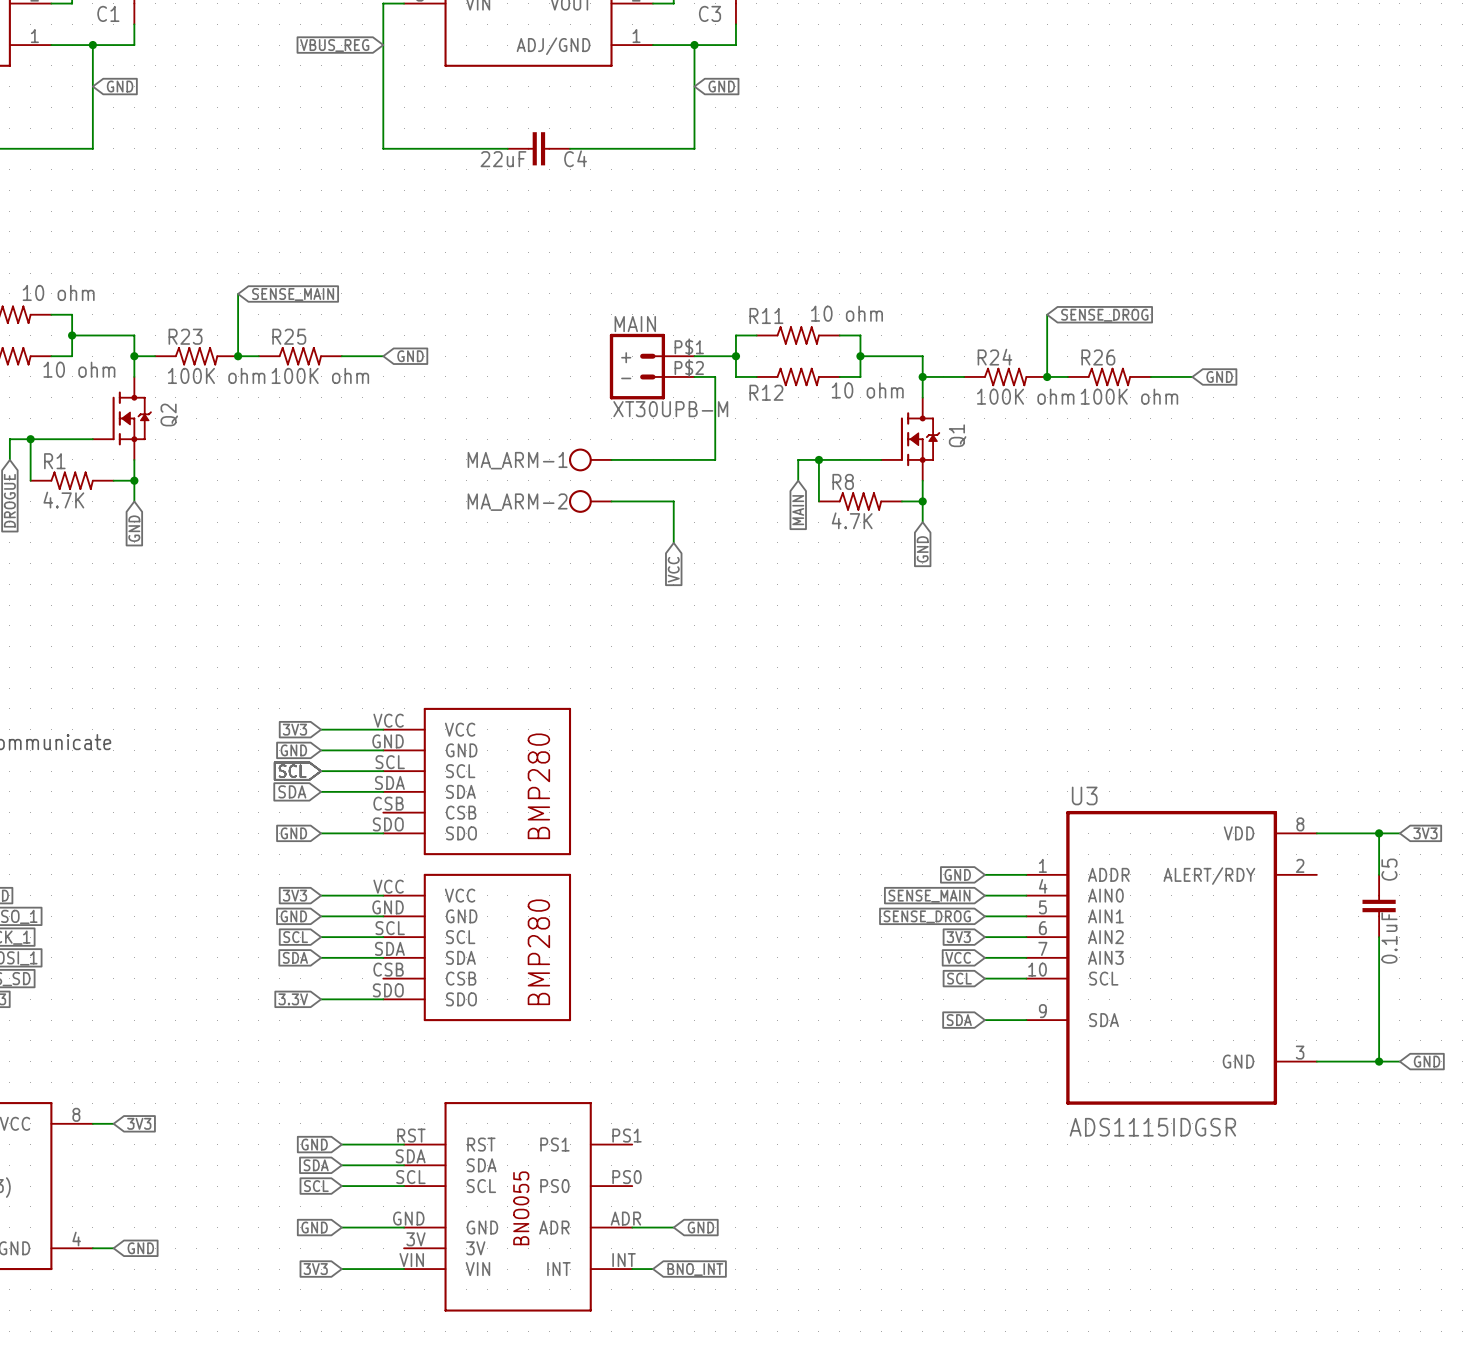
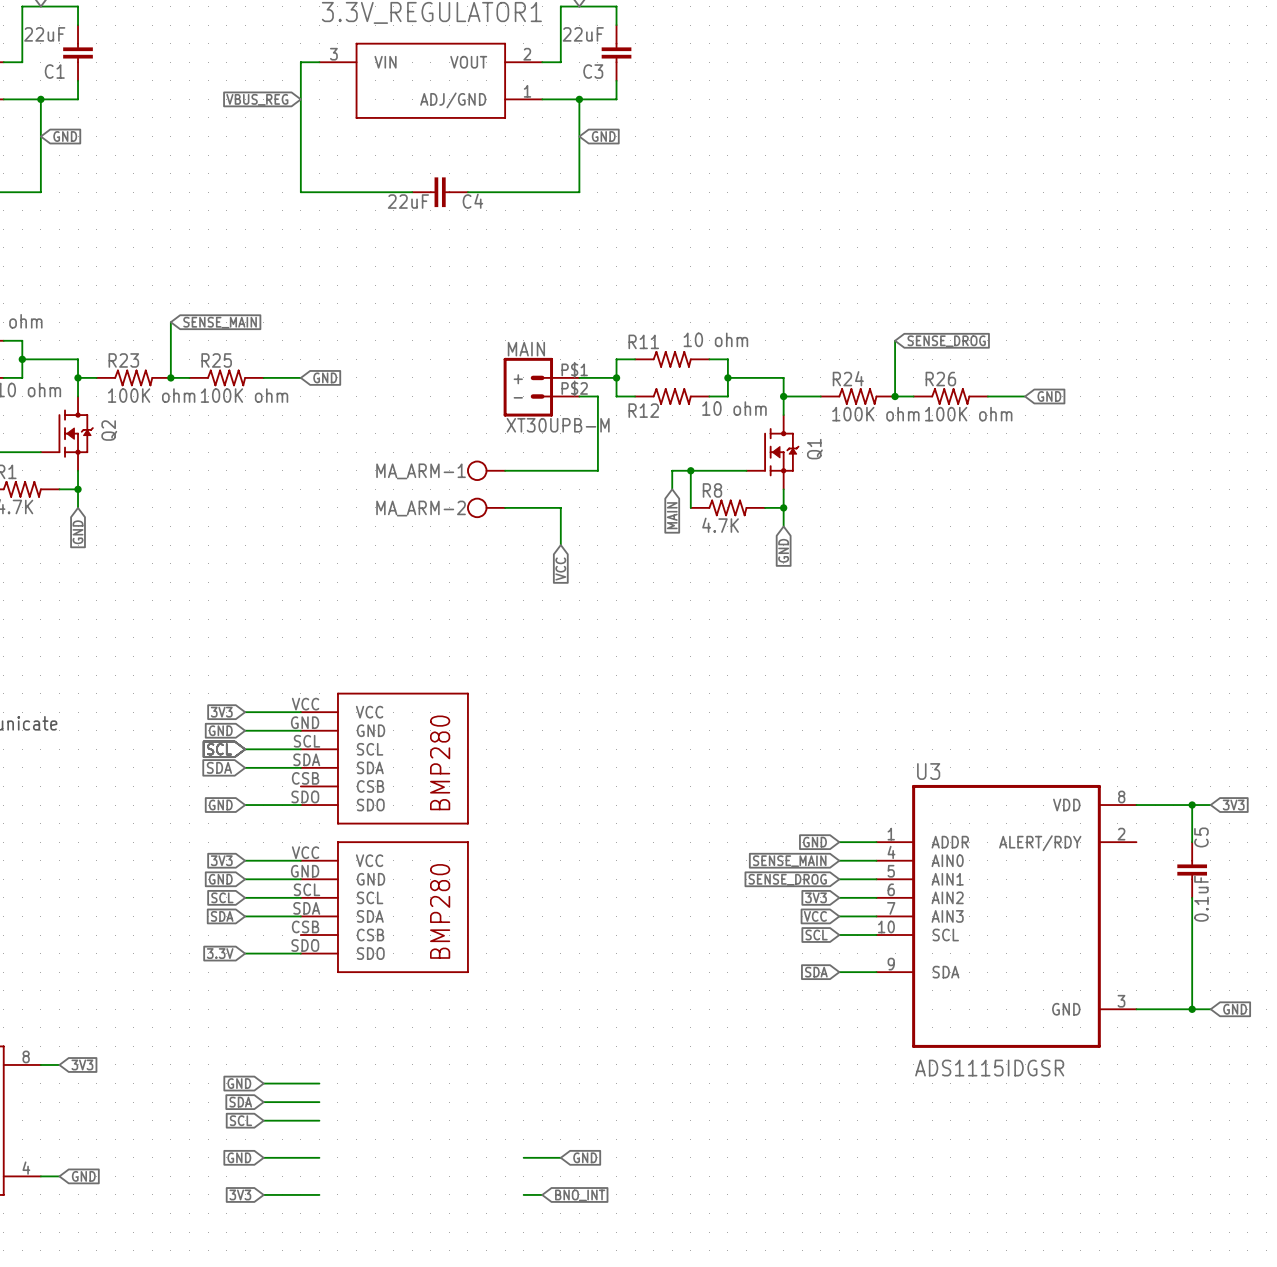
part: (518, 1206) -> none

